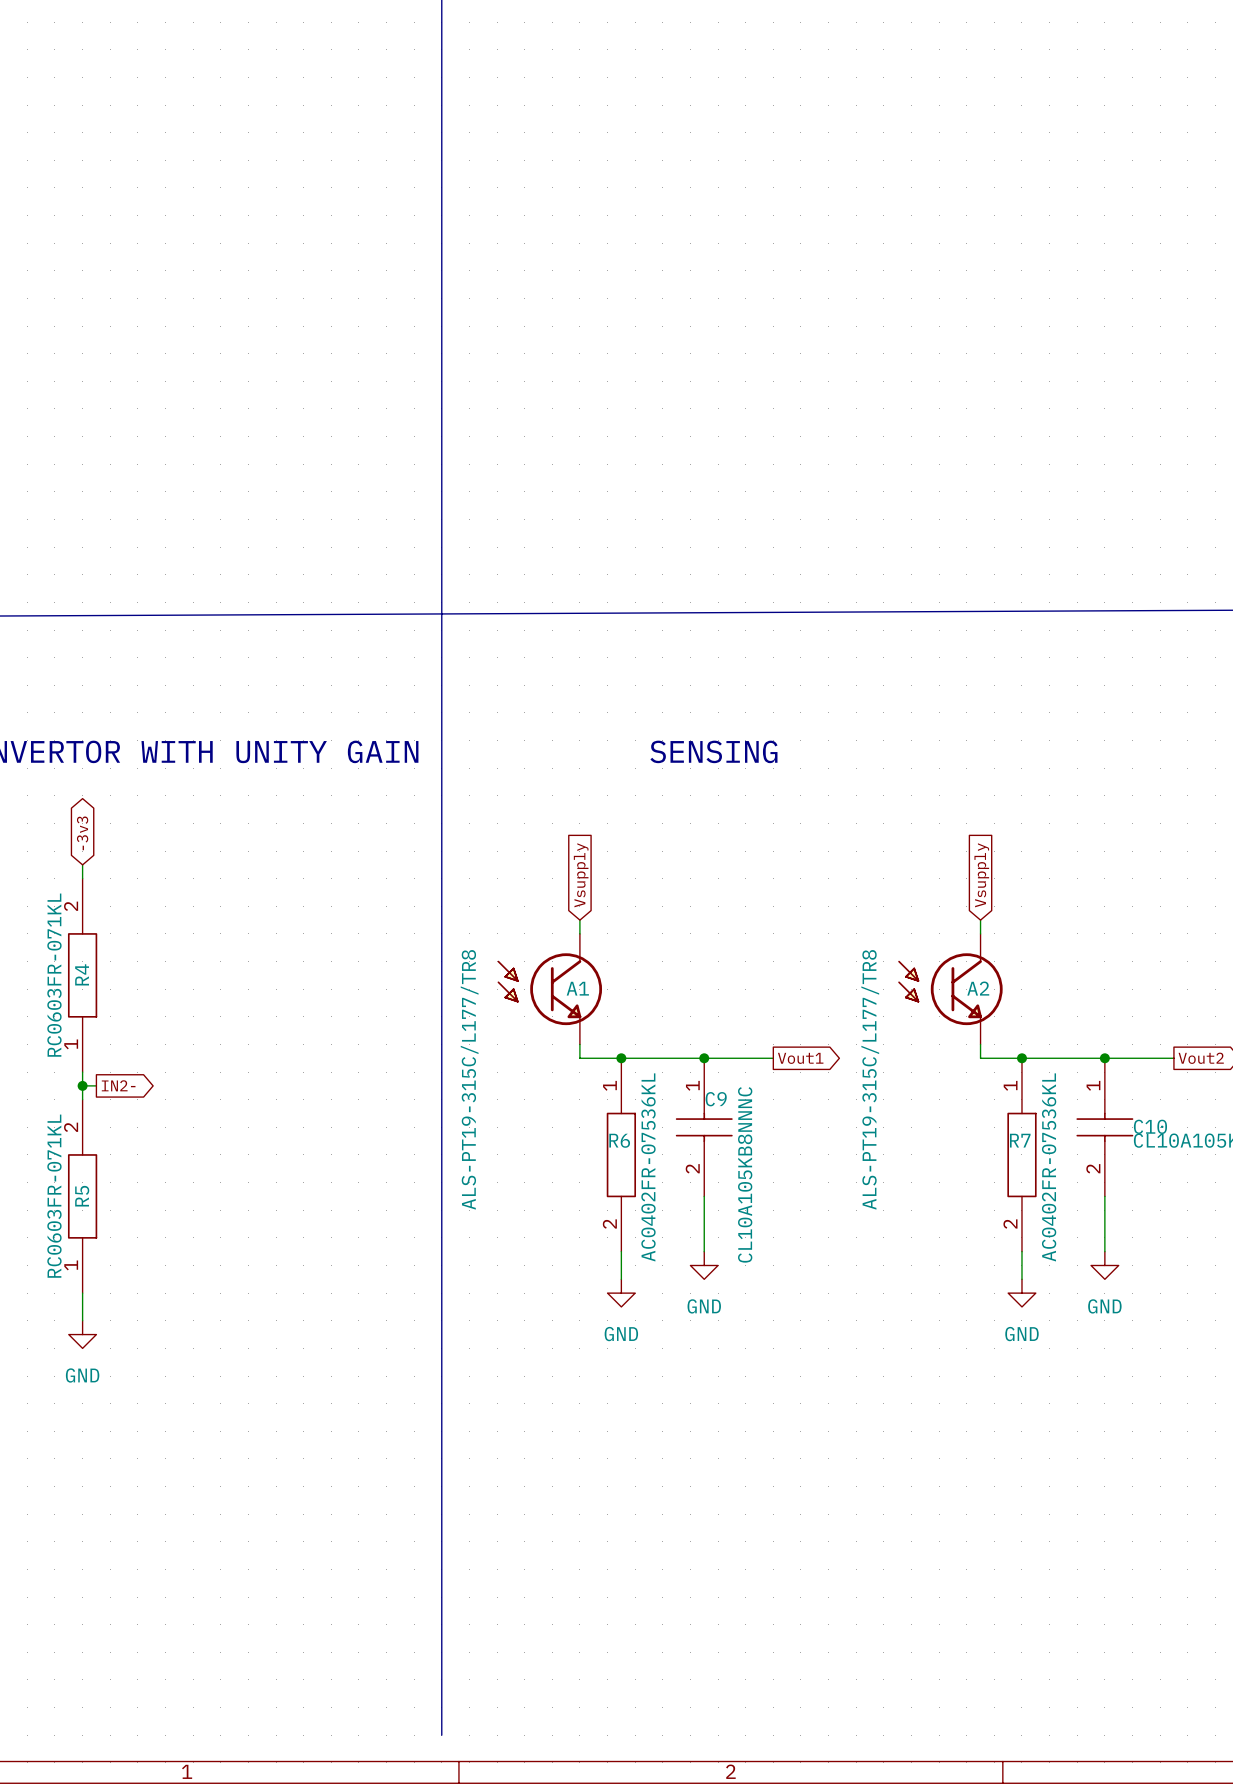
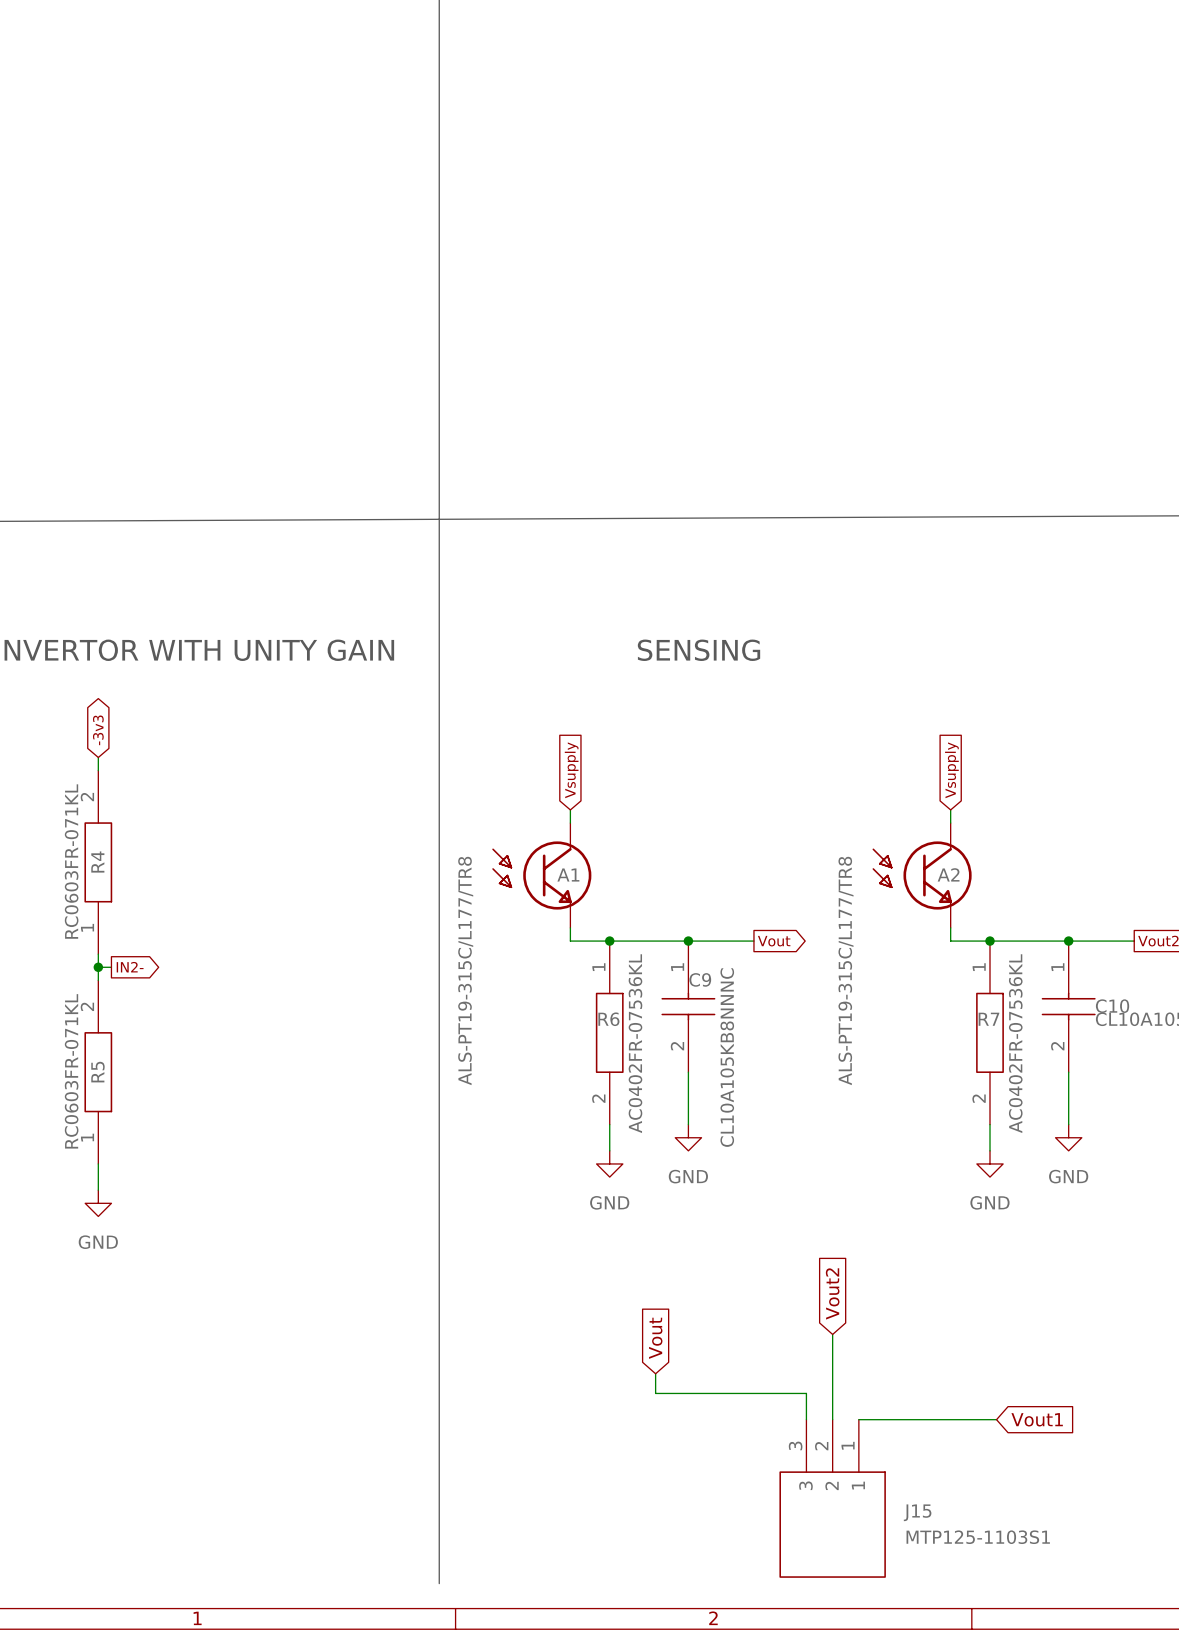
global label: Vout1 (800, 1058) -> Vout (774, 941)
global label: none -> Vout2 (832, 1293)
wire: none -> (832, 1334) (832, 1419)
global label: none -> Vout (655, 1338)
wire: none -> (655, 1373) (655, 1393) (806, 1393) (806, 1419)
wire: none -> (858, 1419) (996, 1419)
global label: none -> Vout1 (1037, 1419)
J15: none -> MTP125-1103S1 (832, 1498)

